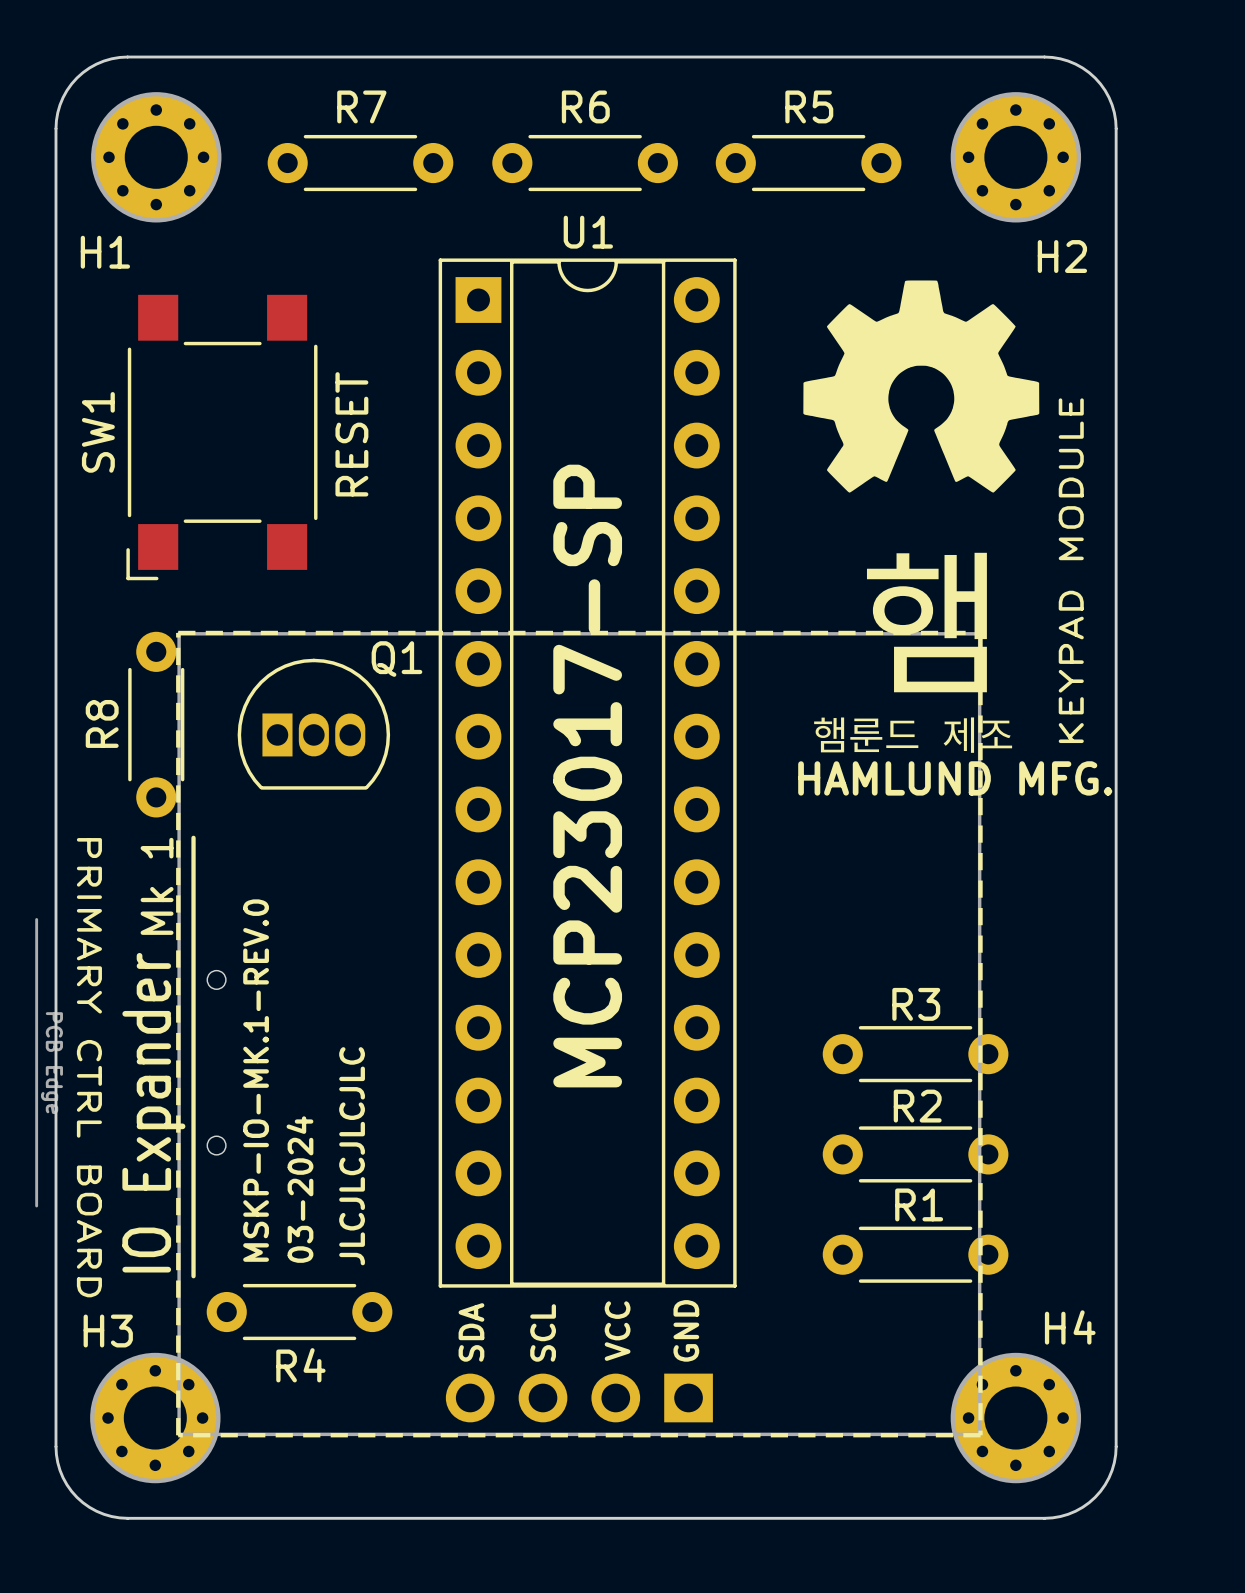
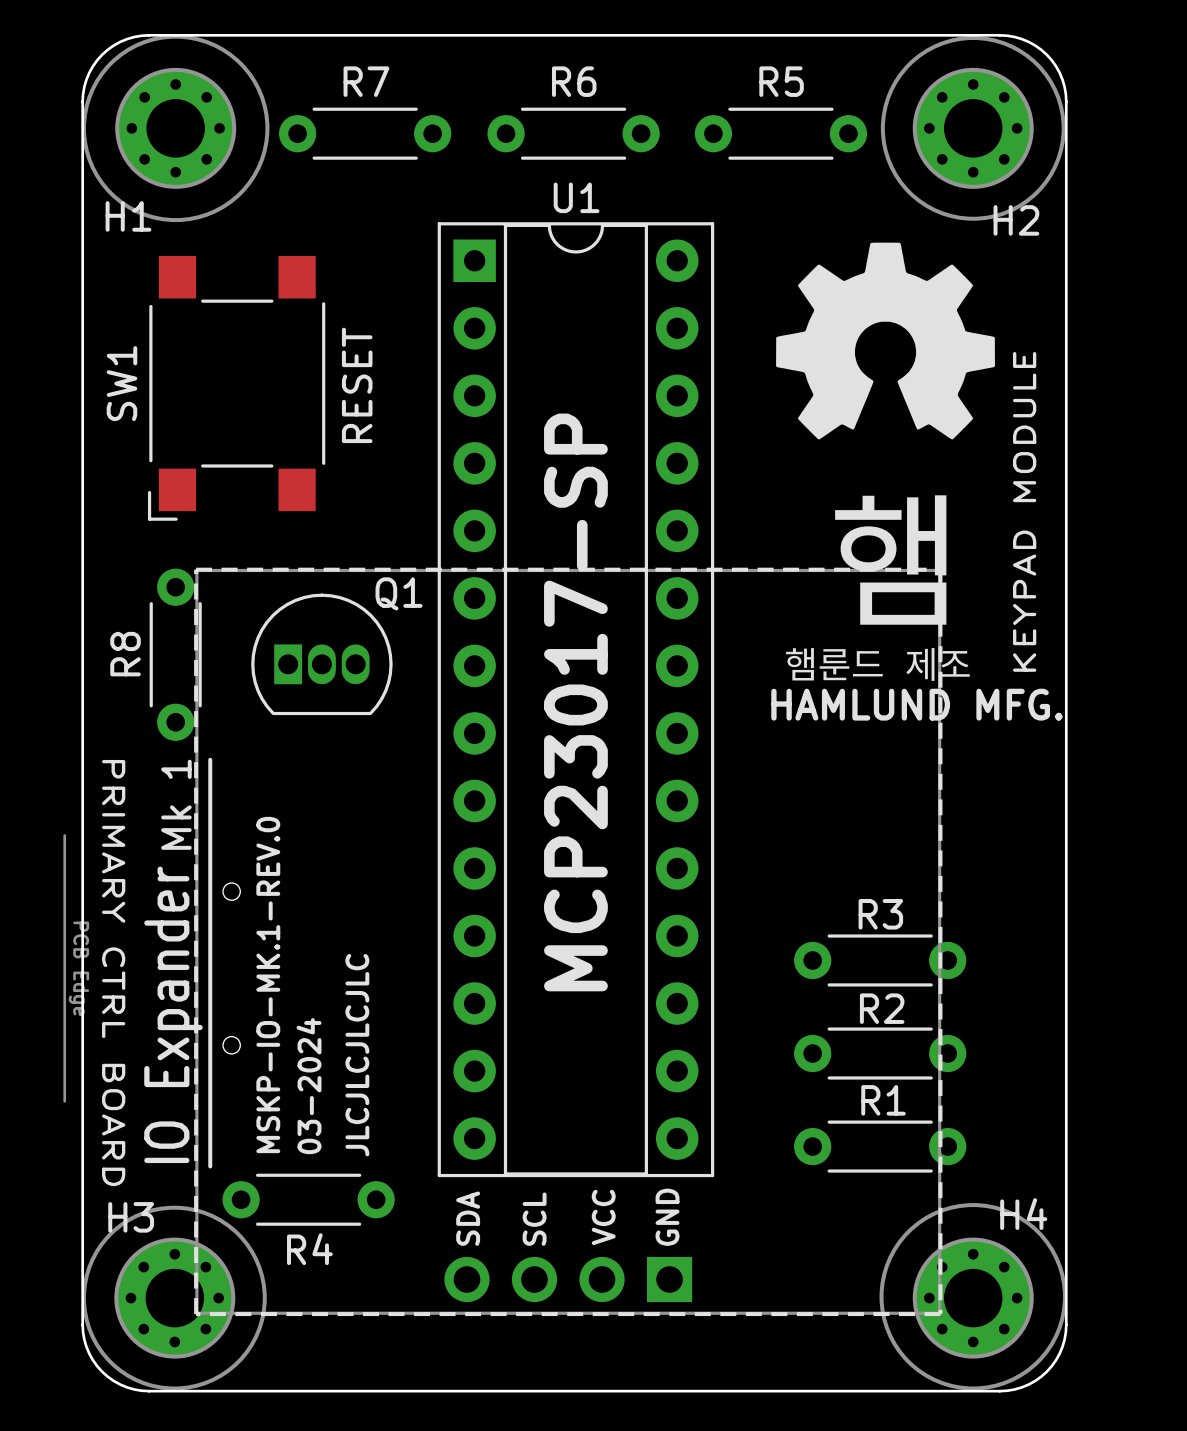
drawing: none -> [81, 34, 270, 223]
drawing: none -> [880, 35, 1066, 221]
drawing: none -> [879, 1203, 1067, 1391]
drawing: none -> [81, 1205, 267, 1391]

